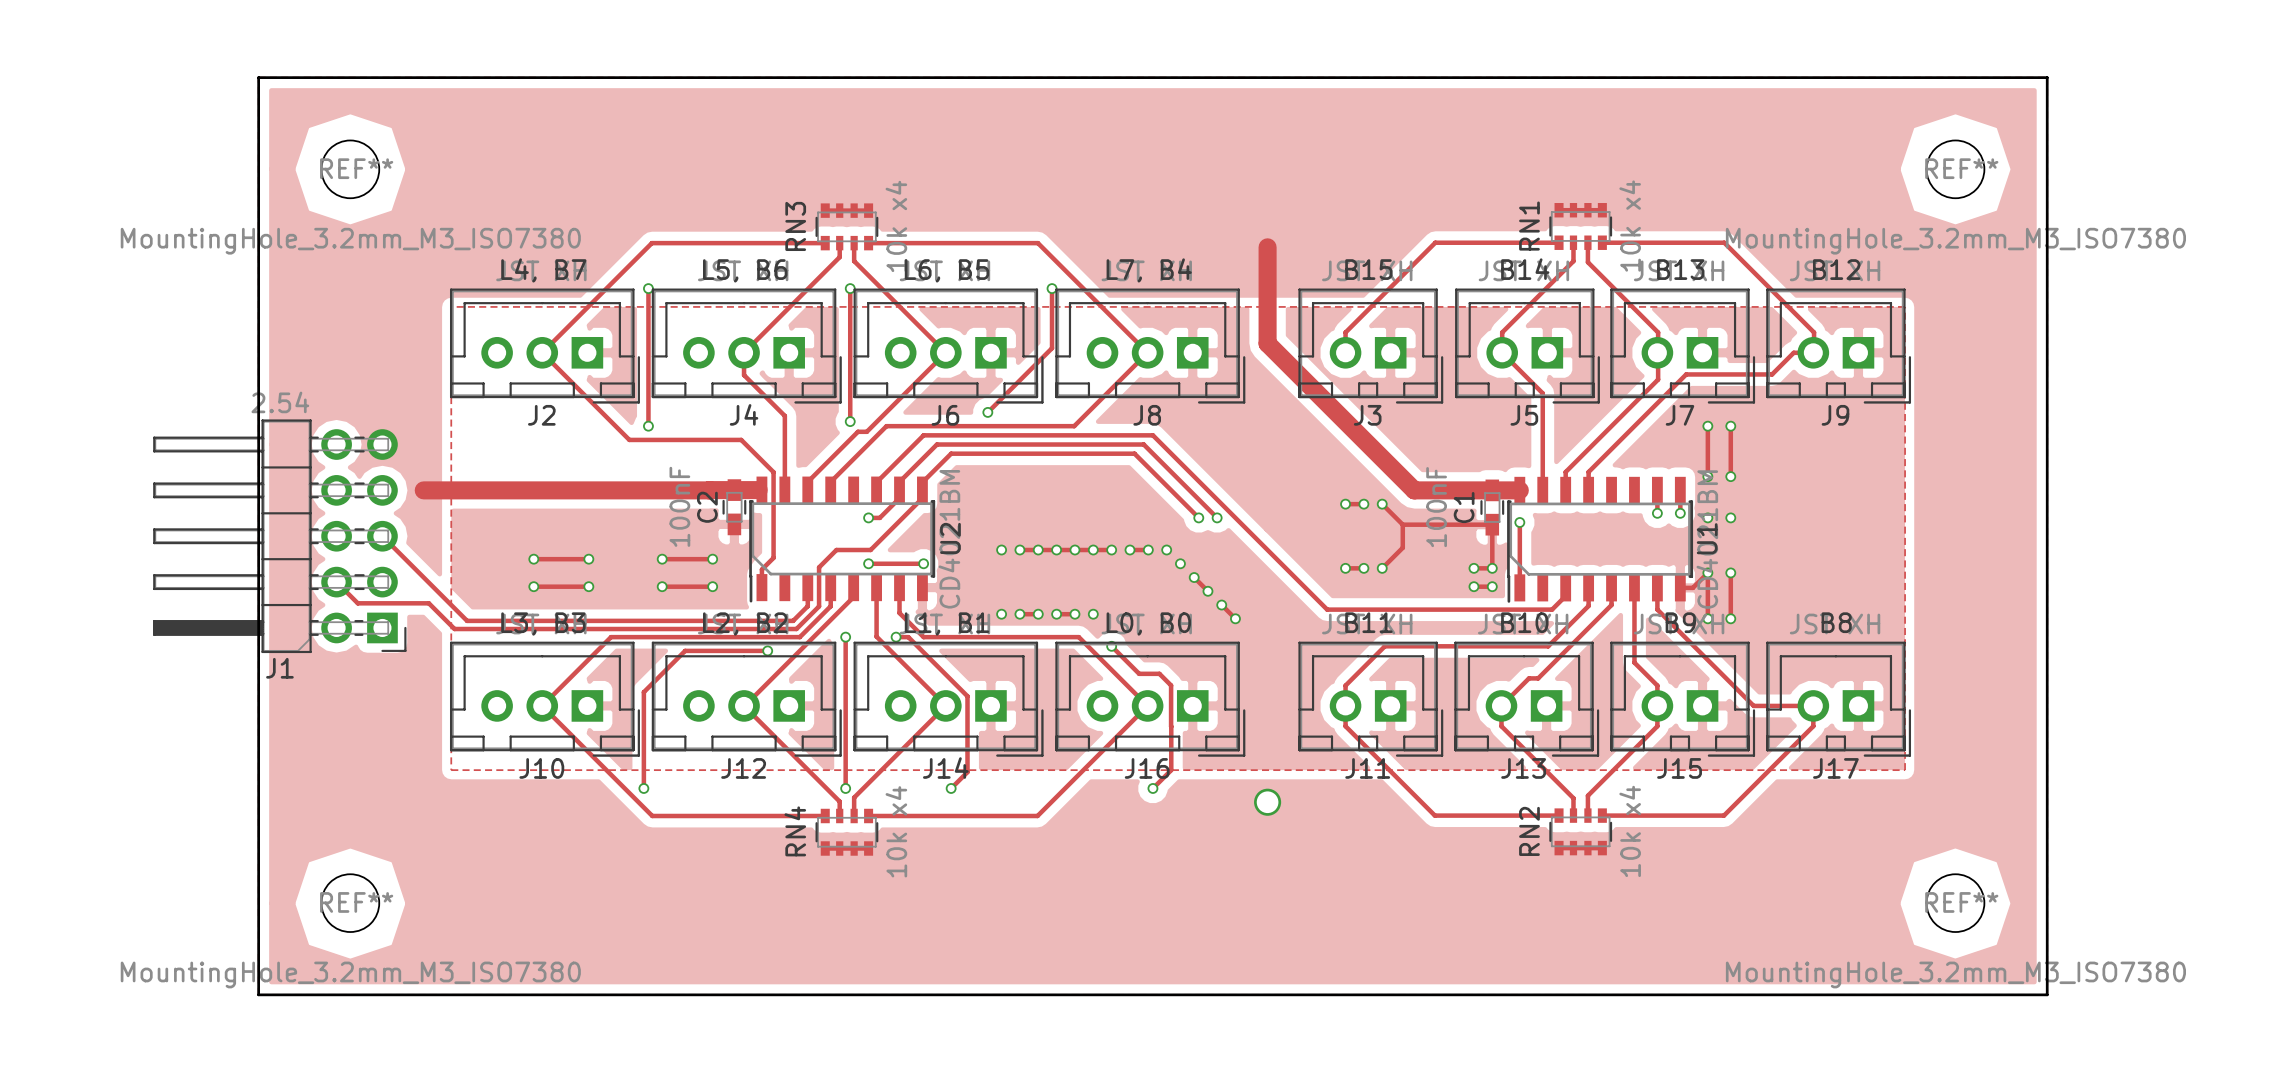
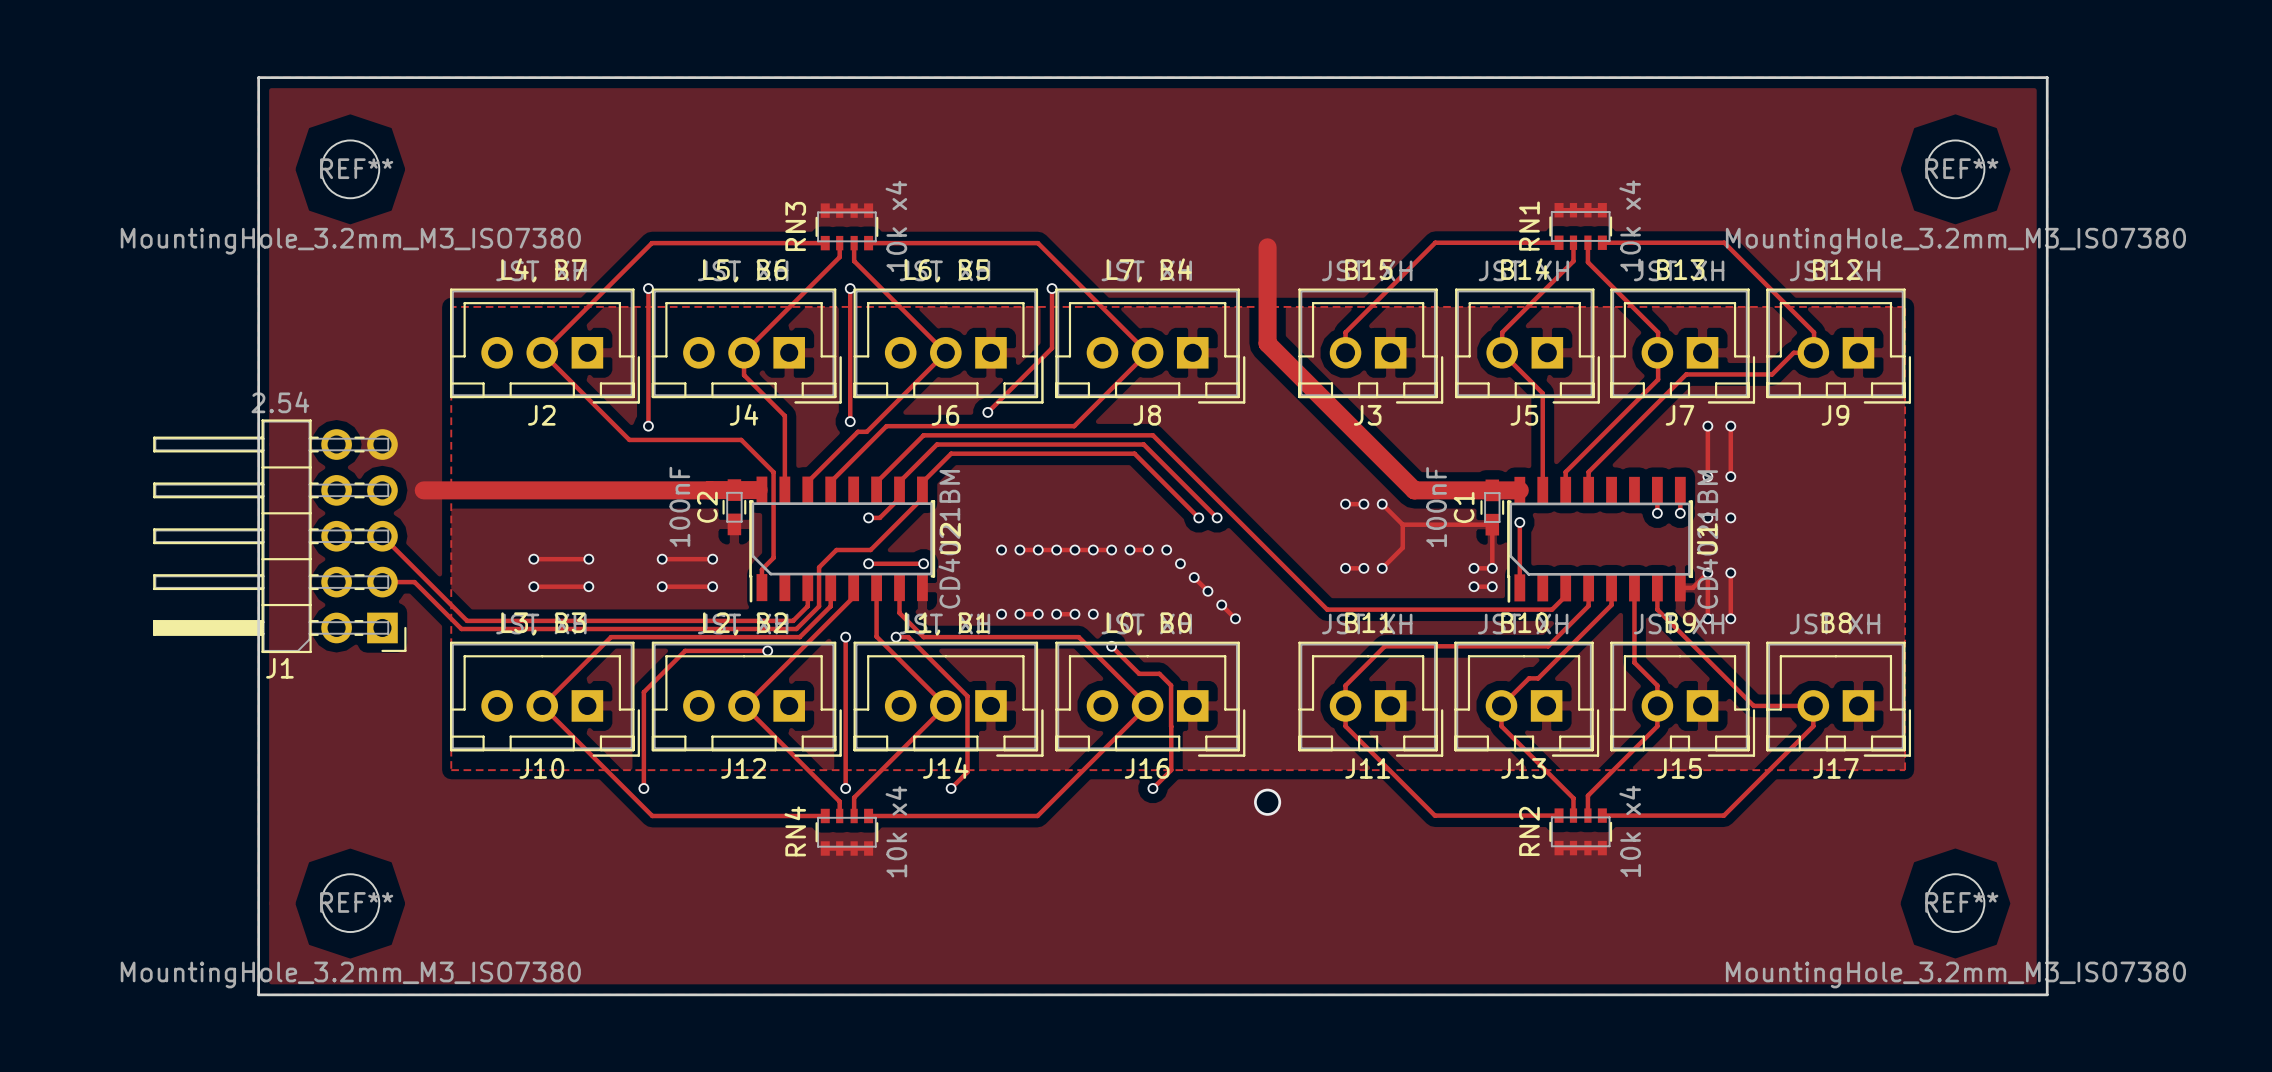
track: (336, 582) (357, 603) (428, 603) (454, 629) (461, 629) -> (382, 582) (414, 582) (461, 629)

